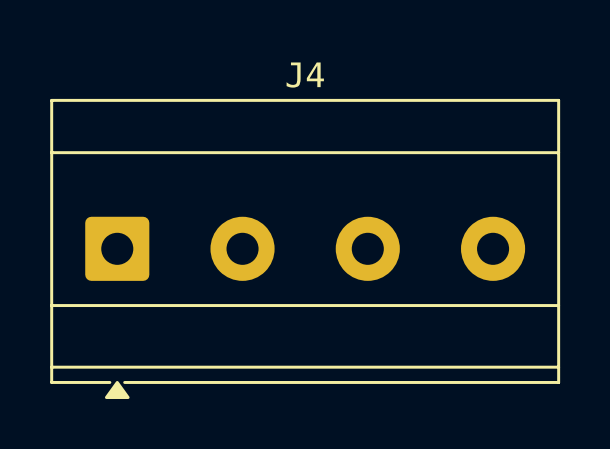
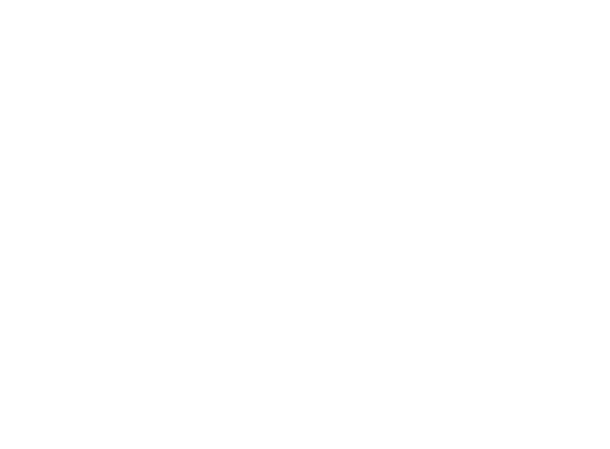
J4: (305, 248) -> none

